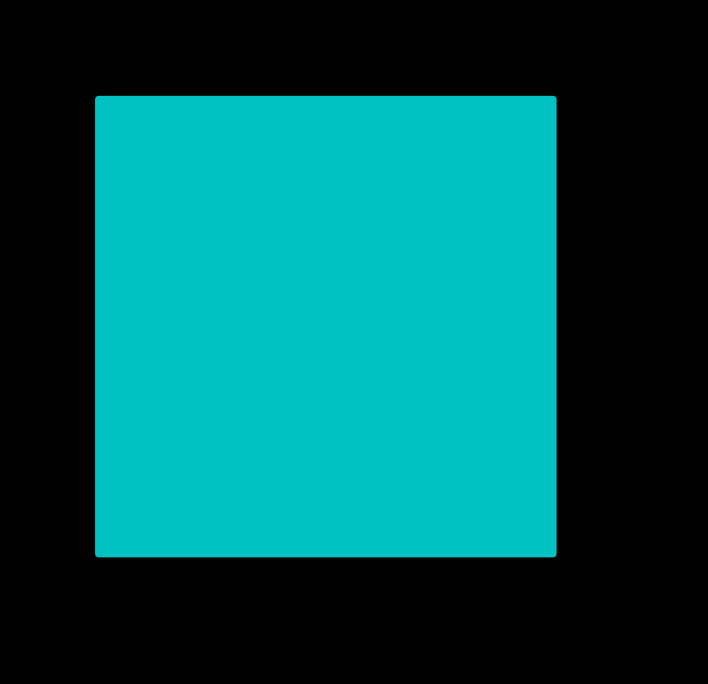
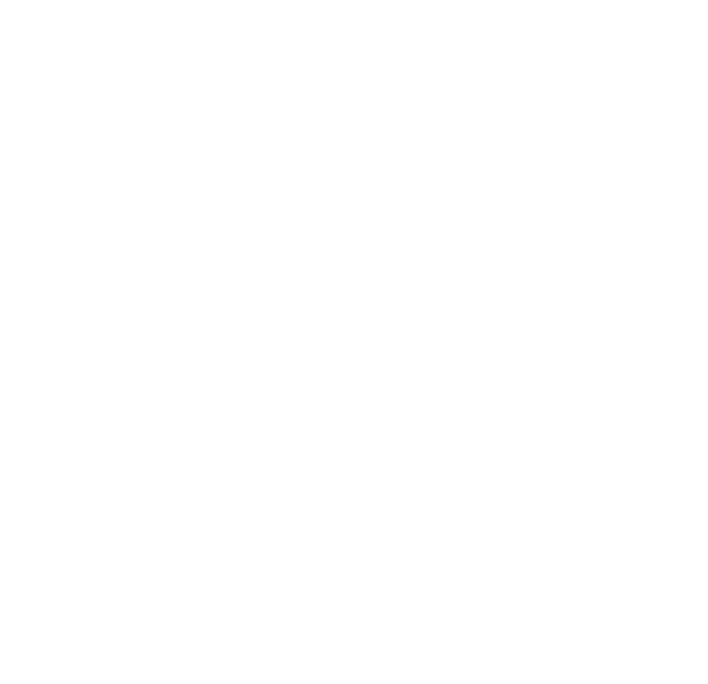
drawing: [95, 95, 557, 558] -> none

